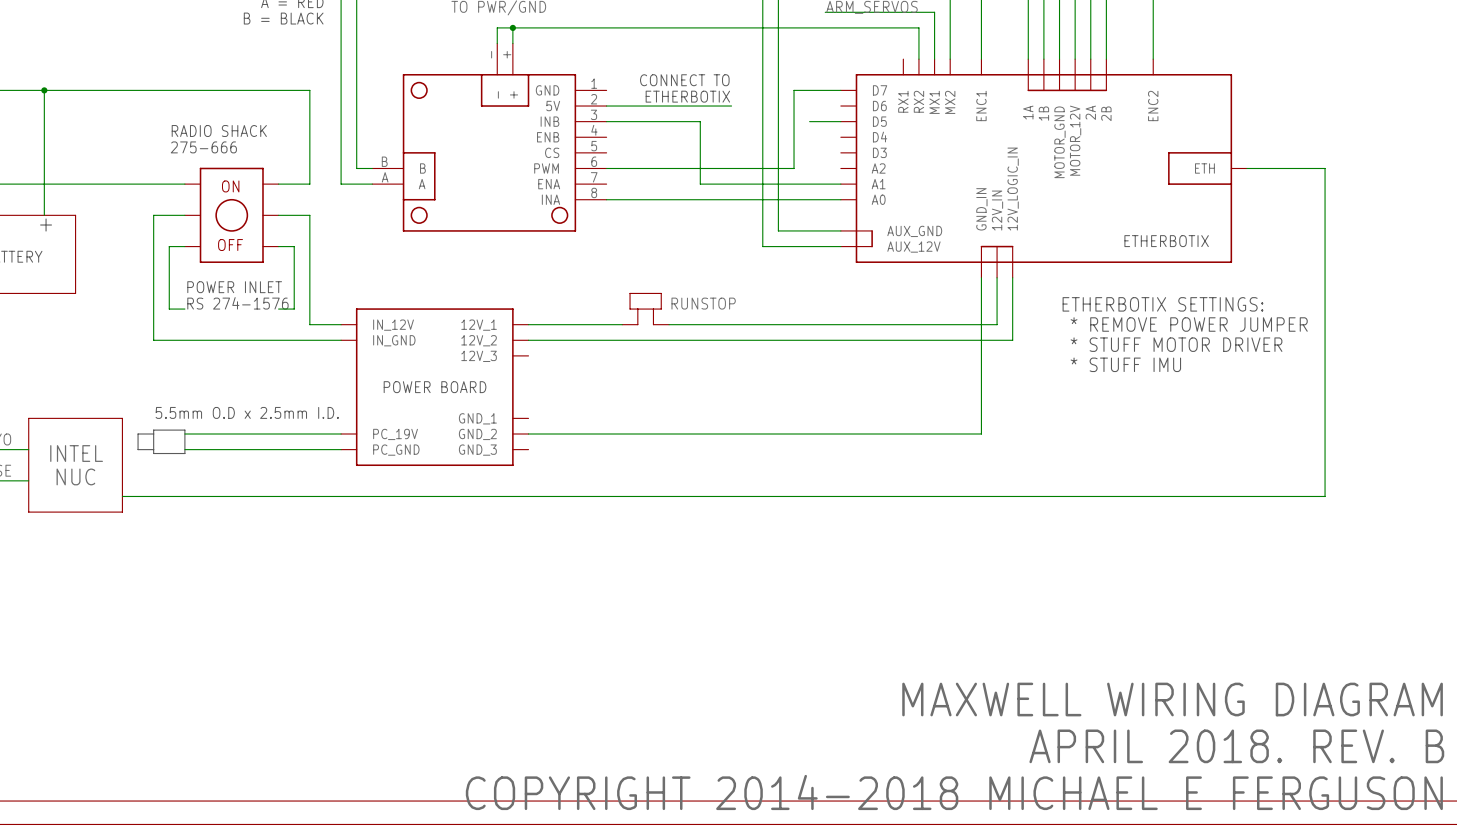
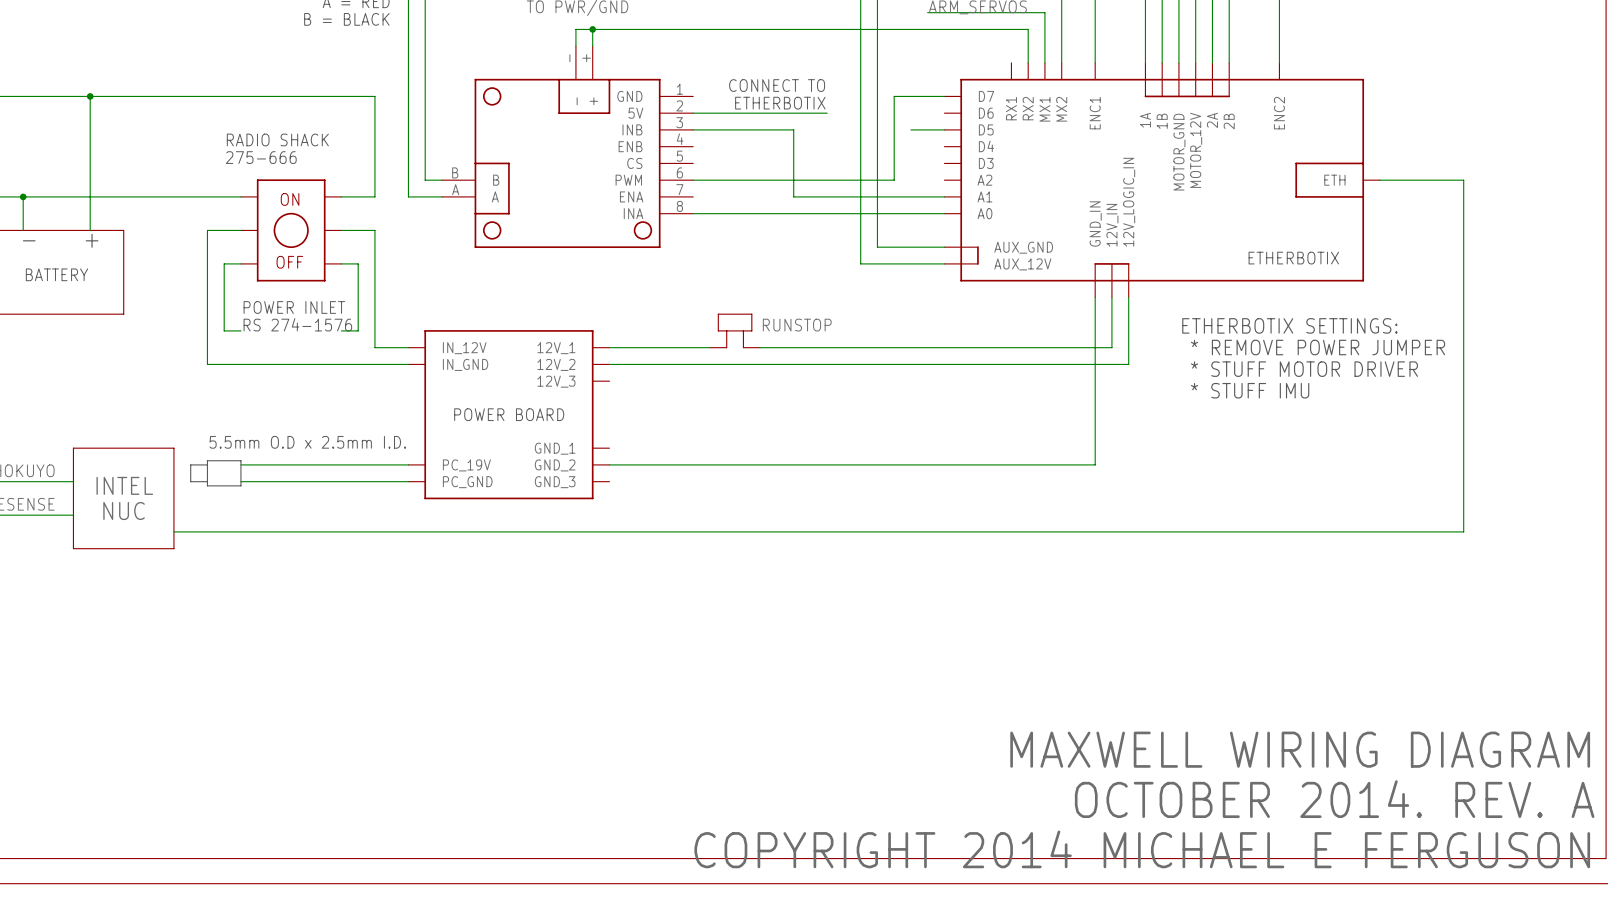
text: APRIL 2018. REV. B (1236, 746) -> OCTOBER 2014. REV. A (1334, 799)
text: COPYRIGHT 2014-2018 MICHAEL E FERGUSON (954, 792) -> COPYRIGHT 2014 MICHAEL E FERGUSON (1142, 849)

